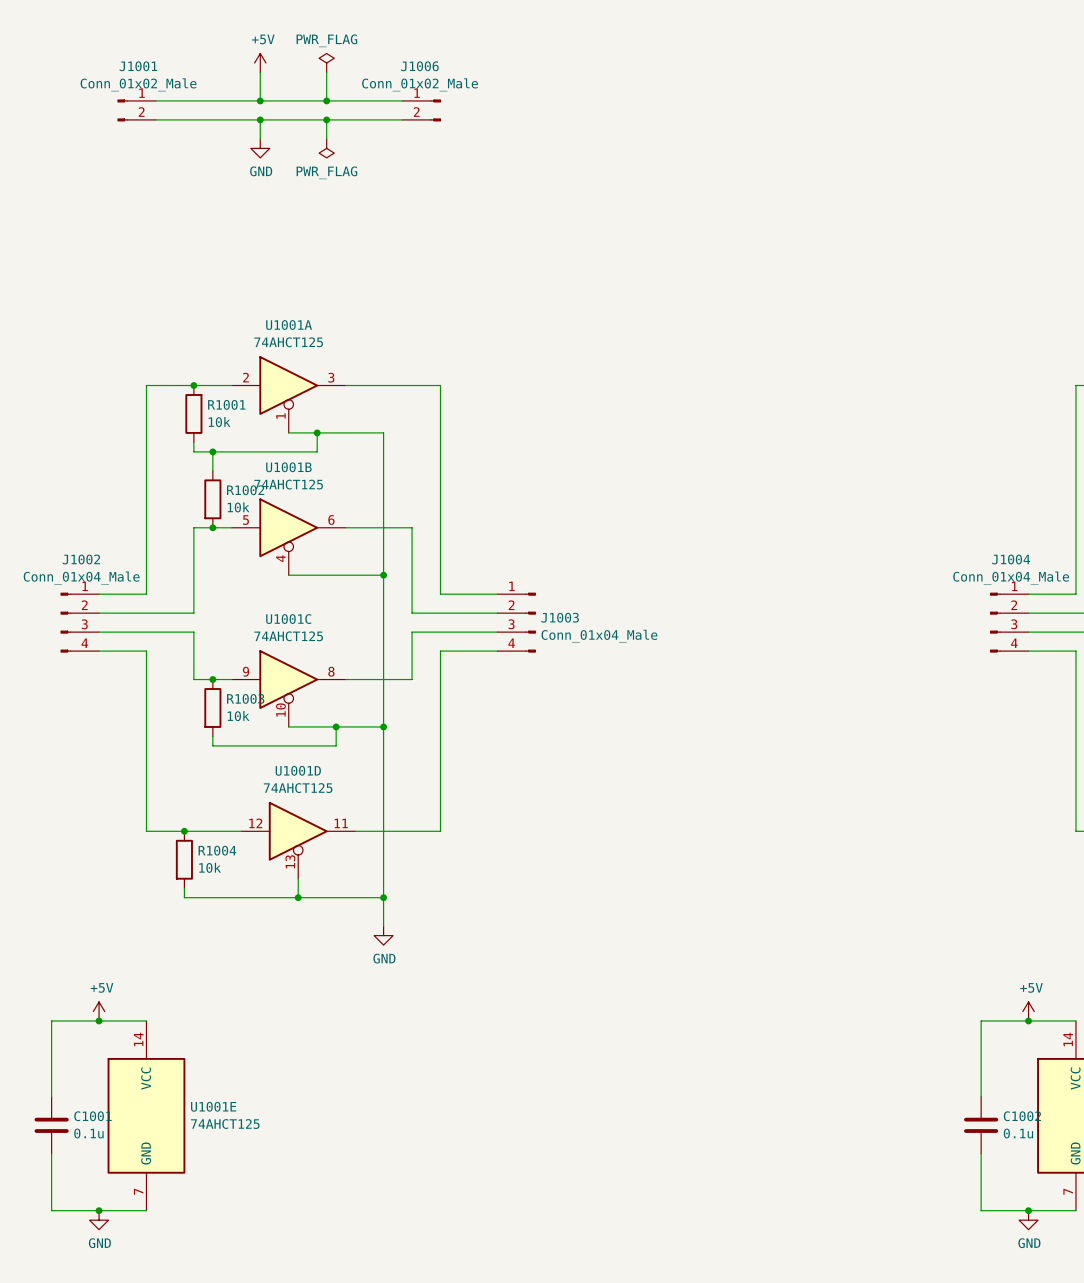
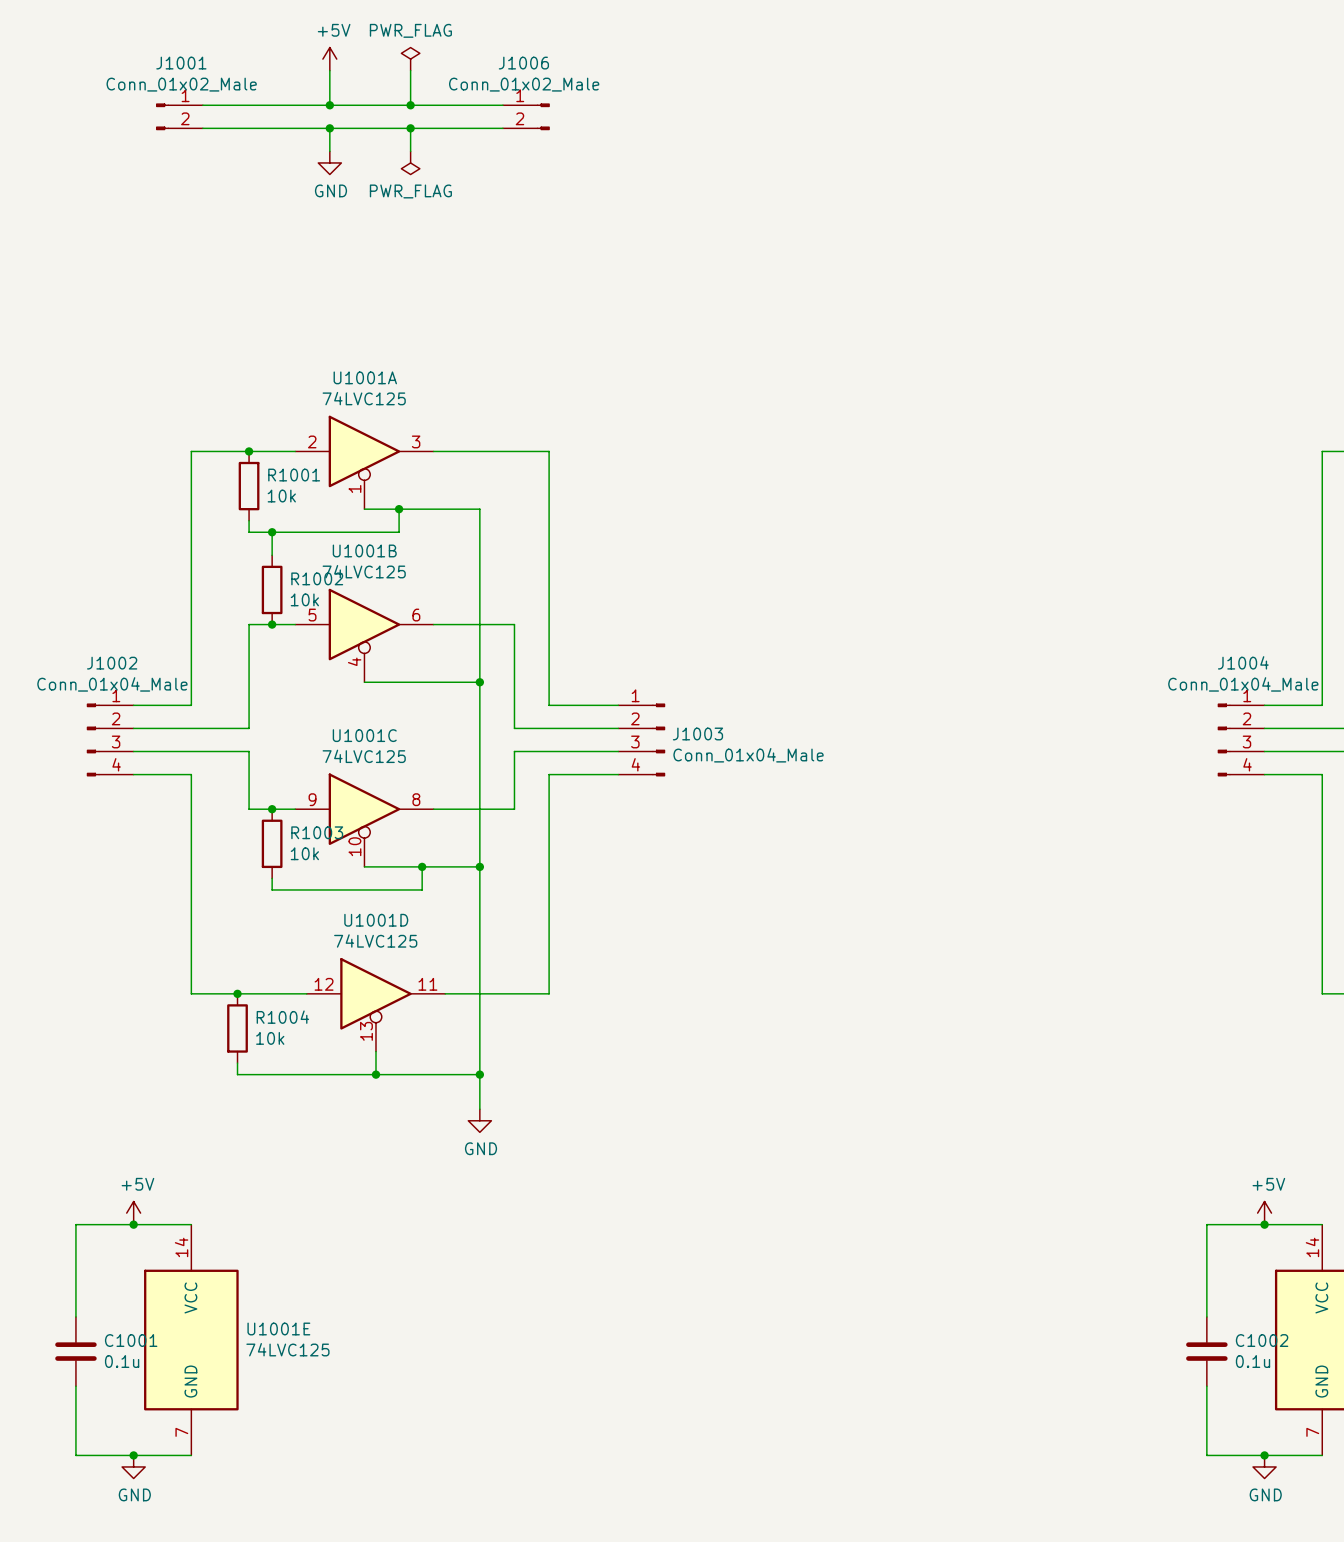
U1001A value: 74AHCT125 (288, 342) -> 74LVC125 (364, 398)
U1001B value: 74AHCT125 (288, 484) -> 74LVC125 (364, 571)
U1001C value: 74AHCT125 (288, 636) -> 74LVC125 (364, 756)
U1001D value: 74AHCT125 (298, 788) -> 74LVC125 (375, 940)
U1001E value: 74AHCT125 (225, 1124) -> 74LVC125 (287, 1349)

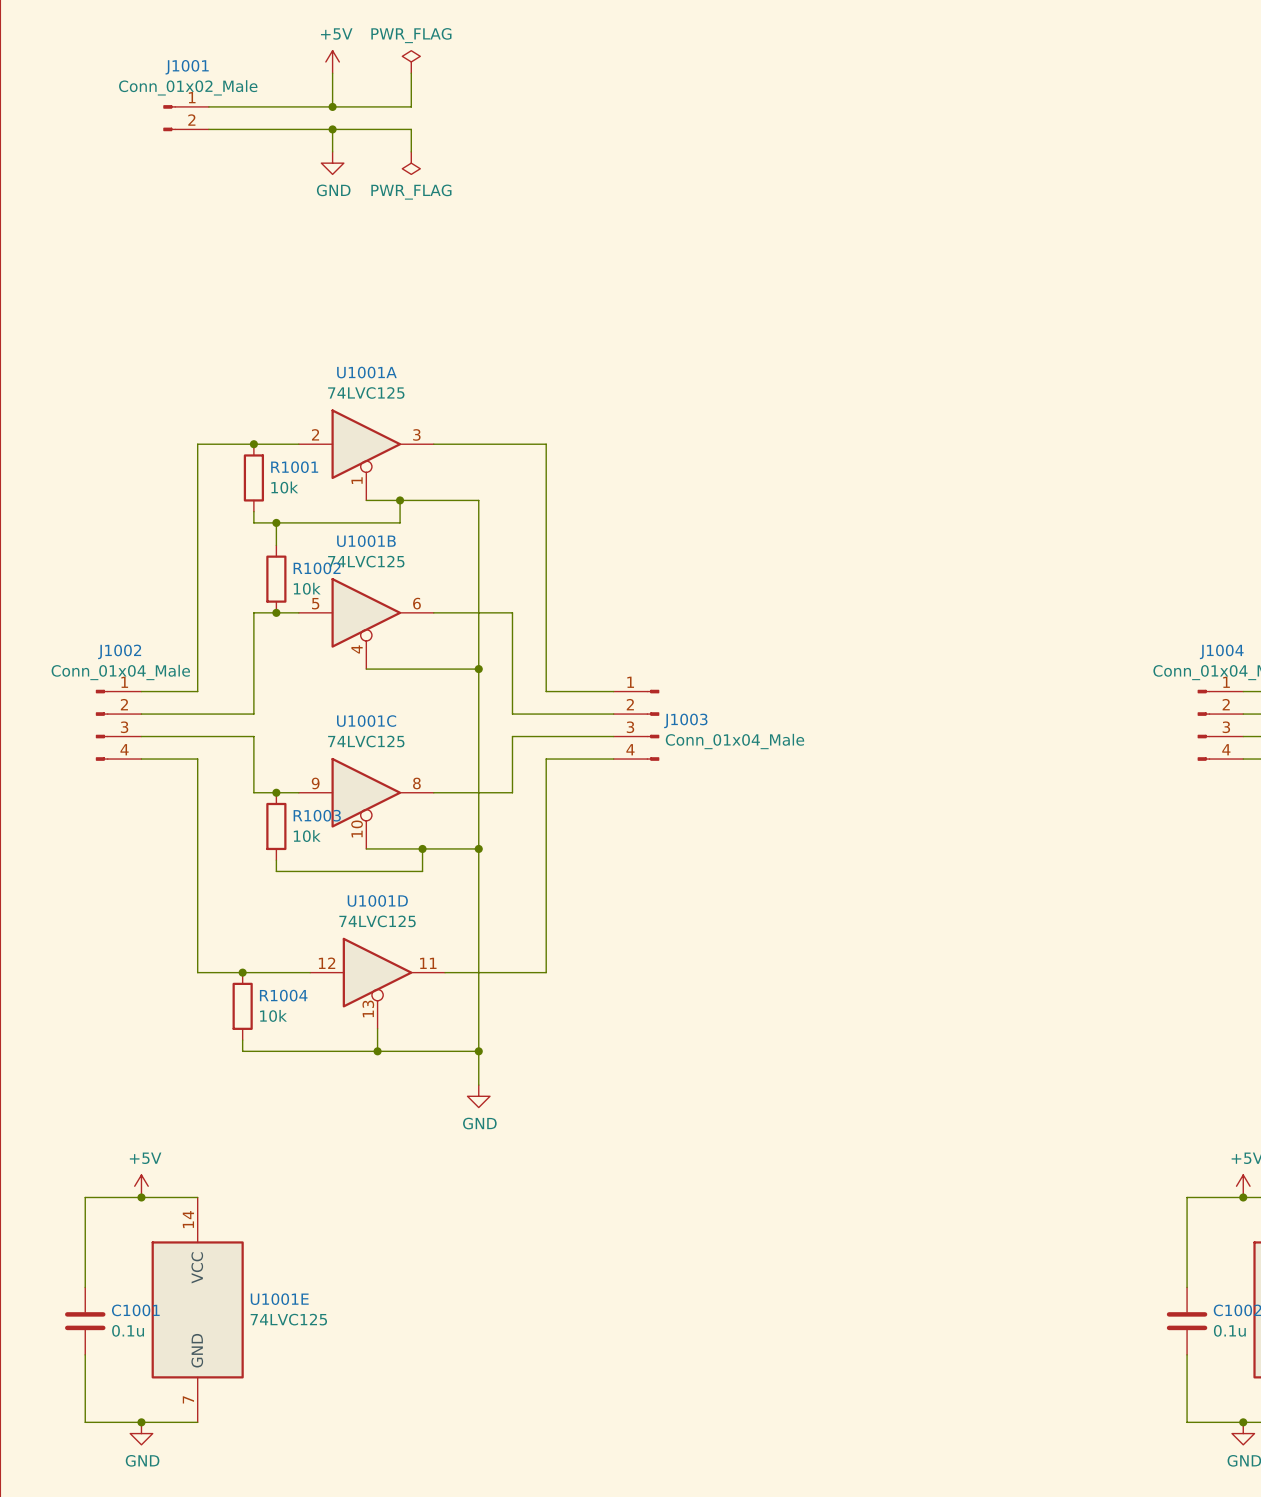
wire: (410, 105) (502, 105) -> none
junction: (410, 105) -> none
J1006: Conn_01x02_Male (526, 116) -> none
wire: (410, 128) (502, 128) -> none
junction: (410, 128) -> none

